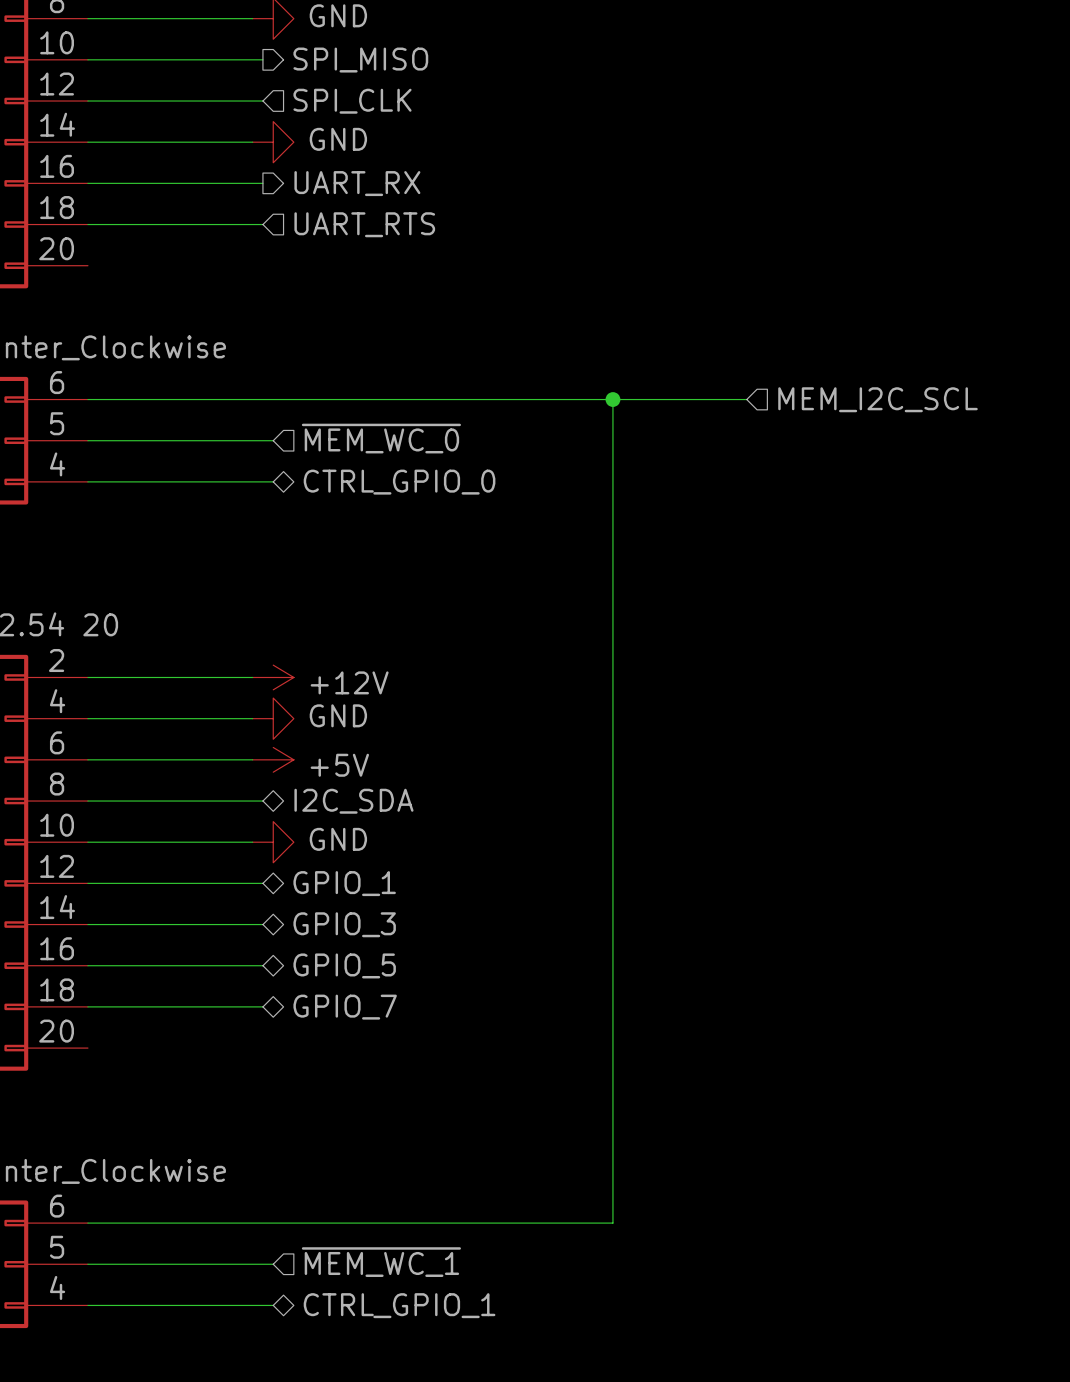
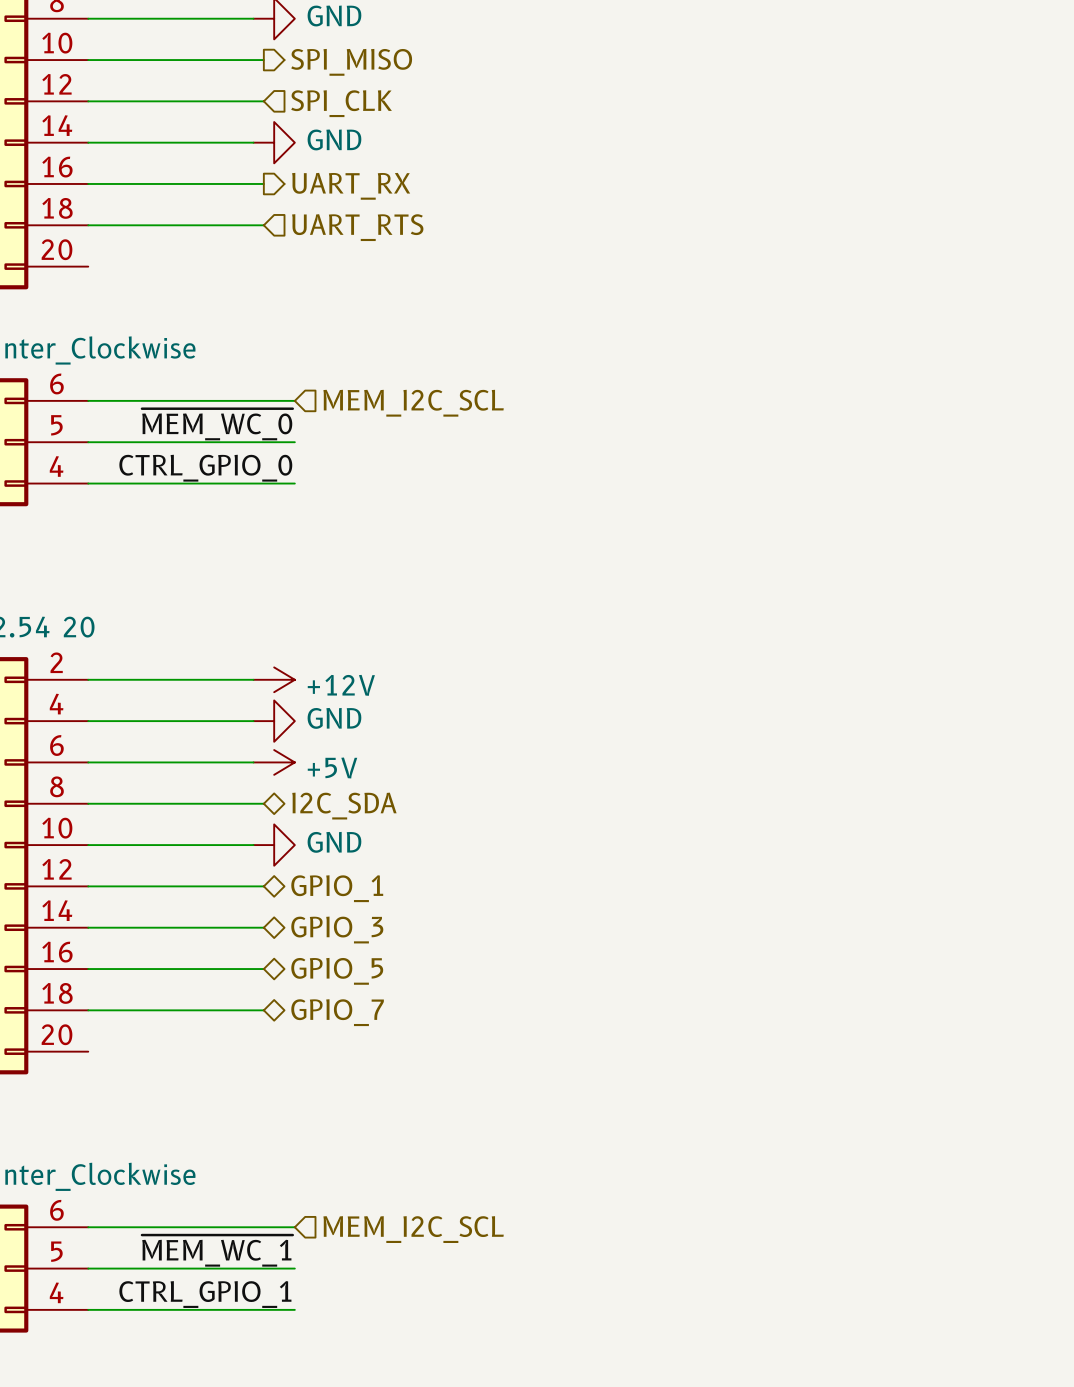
wire: (293, 399) (746, 399) -> none
hierarchical label: none -> MEM_I2C_SCL (413, 403)
wire: (612, 399) (612, 1223) (293, 1223) -> none
junction: (612, 399) -> none
hierarchical label: MEM_I2C_SCL (877, 399) -> none
label: none -> ~{MEM_WC_0} (217, 424)
hierarchical label: ~{MEM_WC_0} (381, 438) -> none
wire: none -> (274, 442) (294, 442)
label: none -> CTRL_GPIO_0 (205, 468)
wire: none -> (274, 483) (294, 483)
hierarchical label: CTRL_GPIO_0 (399, 482) -> none
hierarchical label: none -> MEM_I2C_SCL (413, 1229)
label: none -> ~{MEM_WC_1} (217, 1250)
hierarchical label: ~{MEM_WC_1} (381, 1262) -> none
wire: none -> (274, 1268) (294, 1268)
label: none -> CTRL_GPIO_1 (205, 1294)
wire: none -> (274, 1309) (294, 1309)
hierarchical label: CTRL_GPIO_1 (399, 1305) -> none

